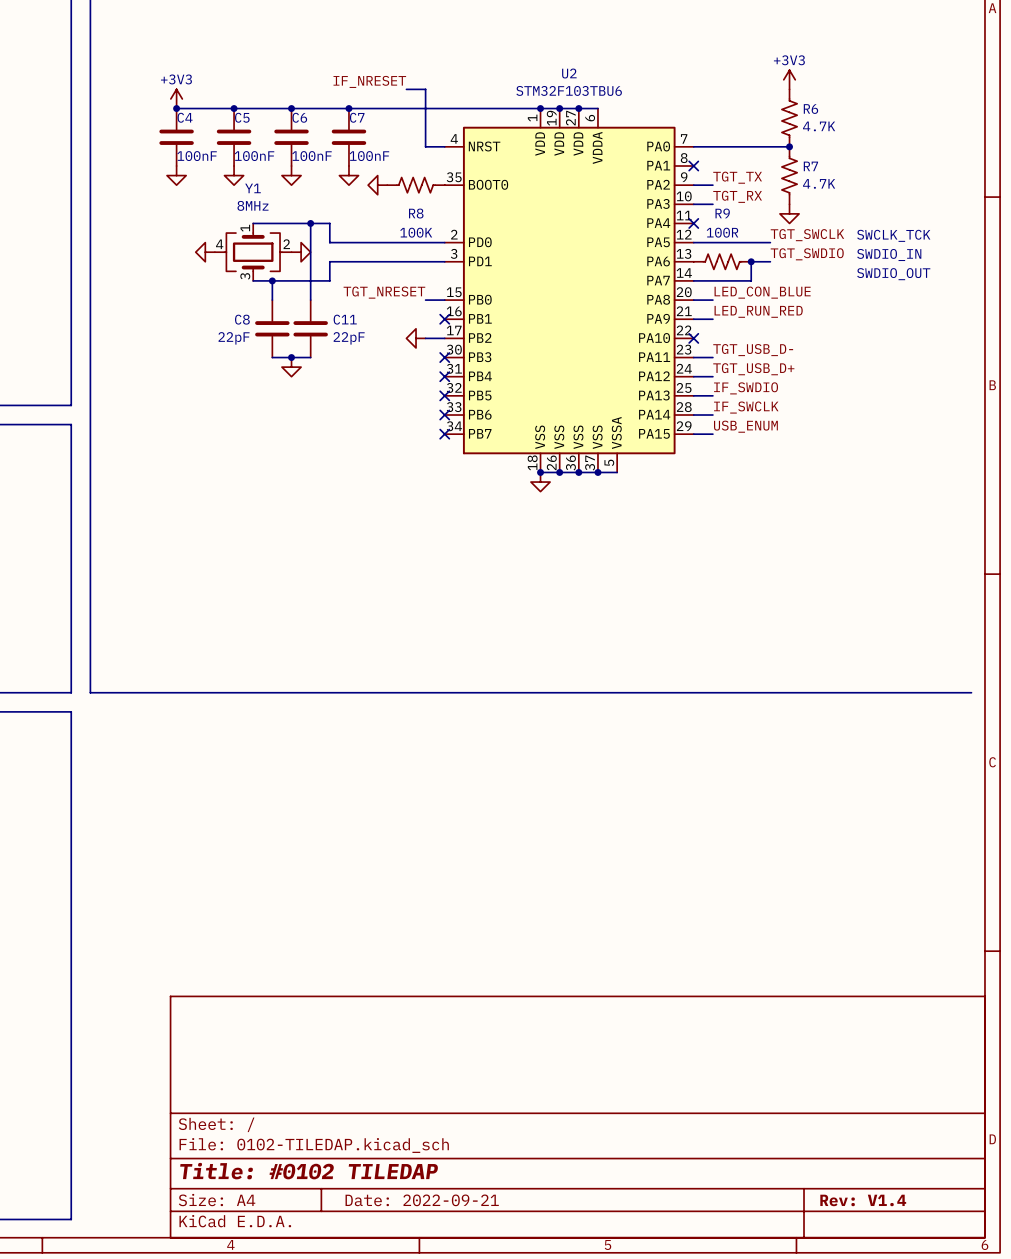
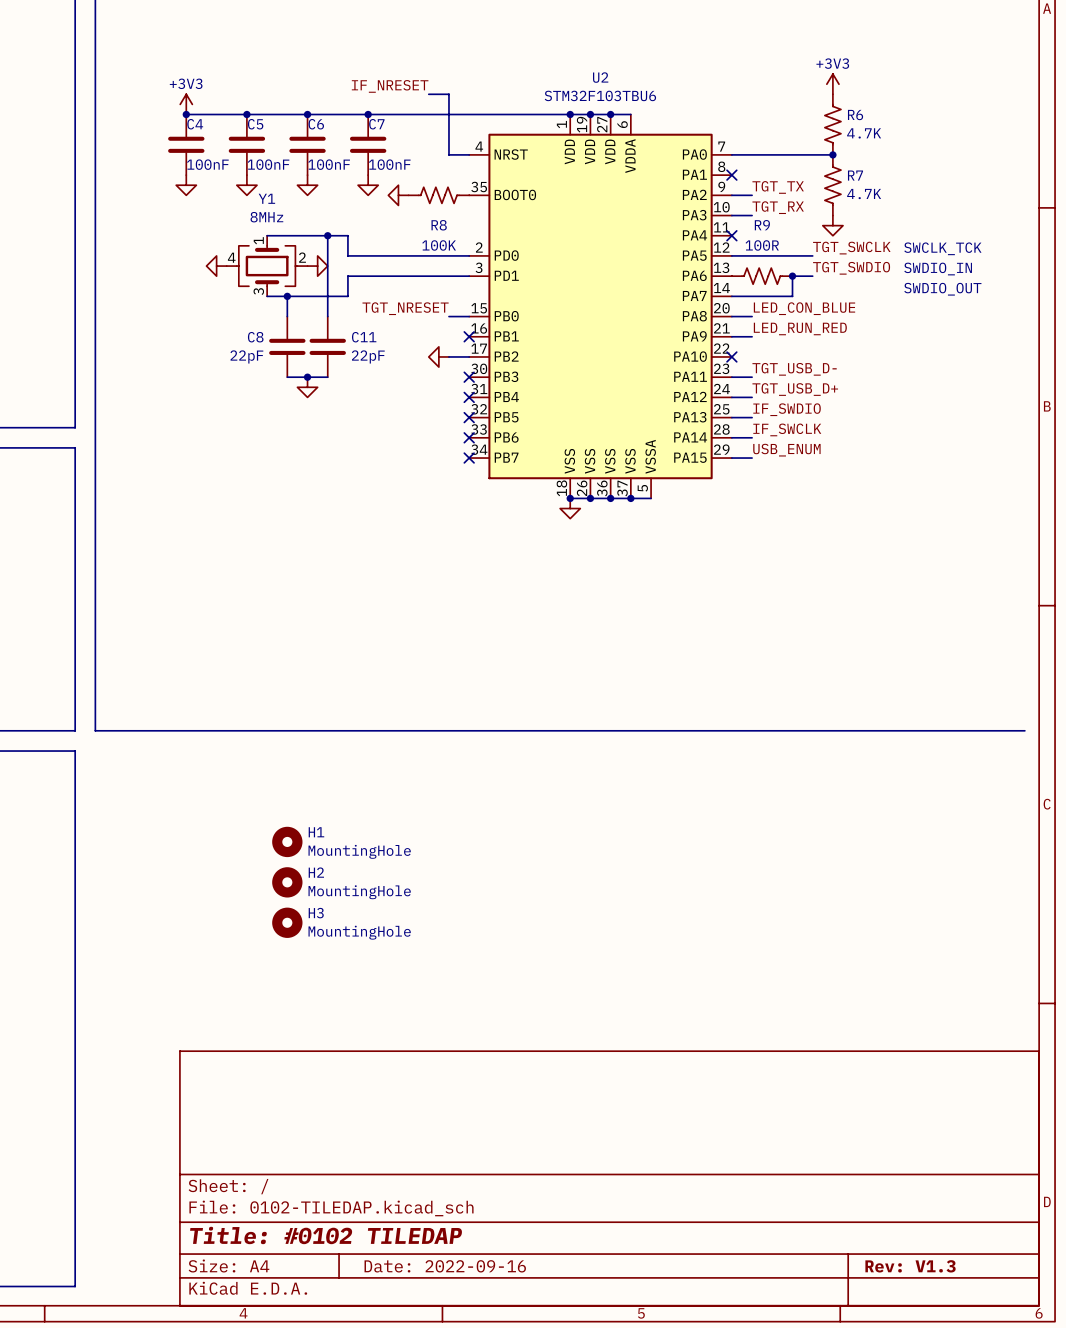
H1: none -> MountingHole (287, 841)
H2: none -> MountingHole (287, 882)
H3: none -> MountingHole (287, 922)
title block: Date: 2022-09-21 (422, 1200) -> Date: 2022-09-16 (445, 1266)
title block: Rev: V1.4 (863, 1200) -> Rev: V1.3 (910, 1266)

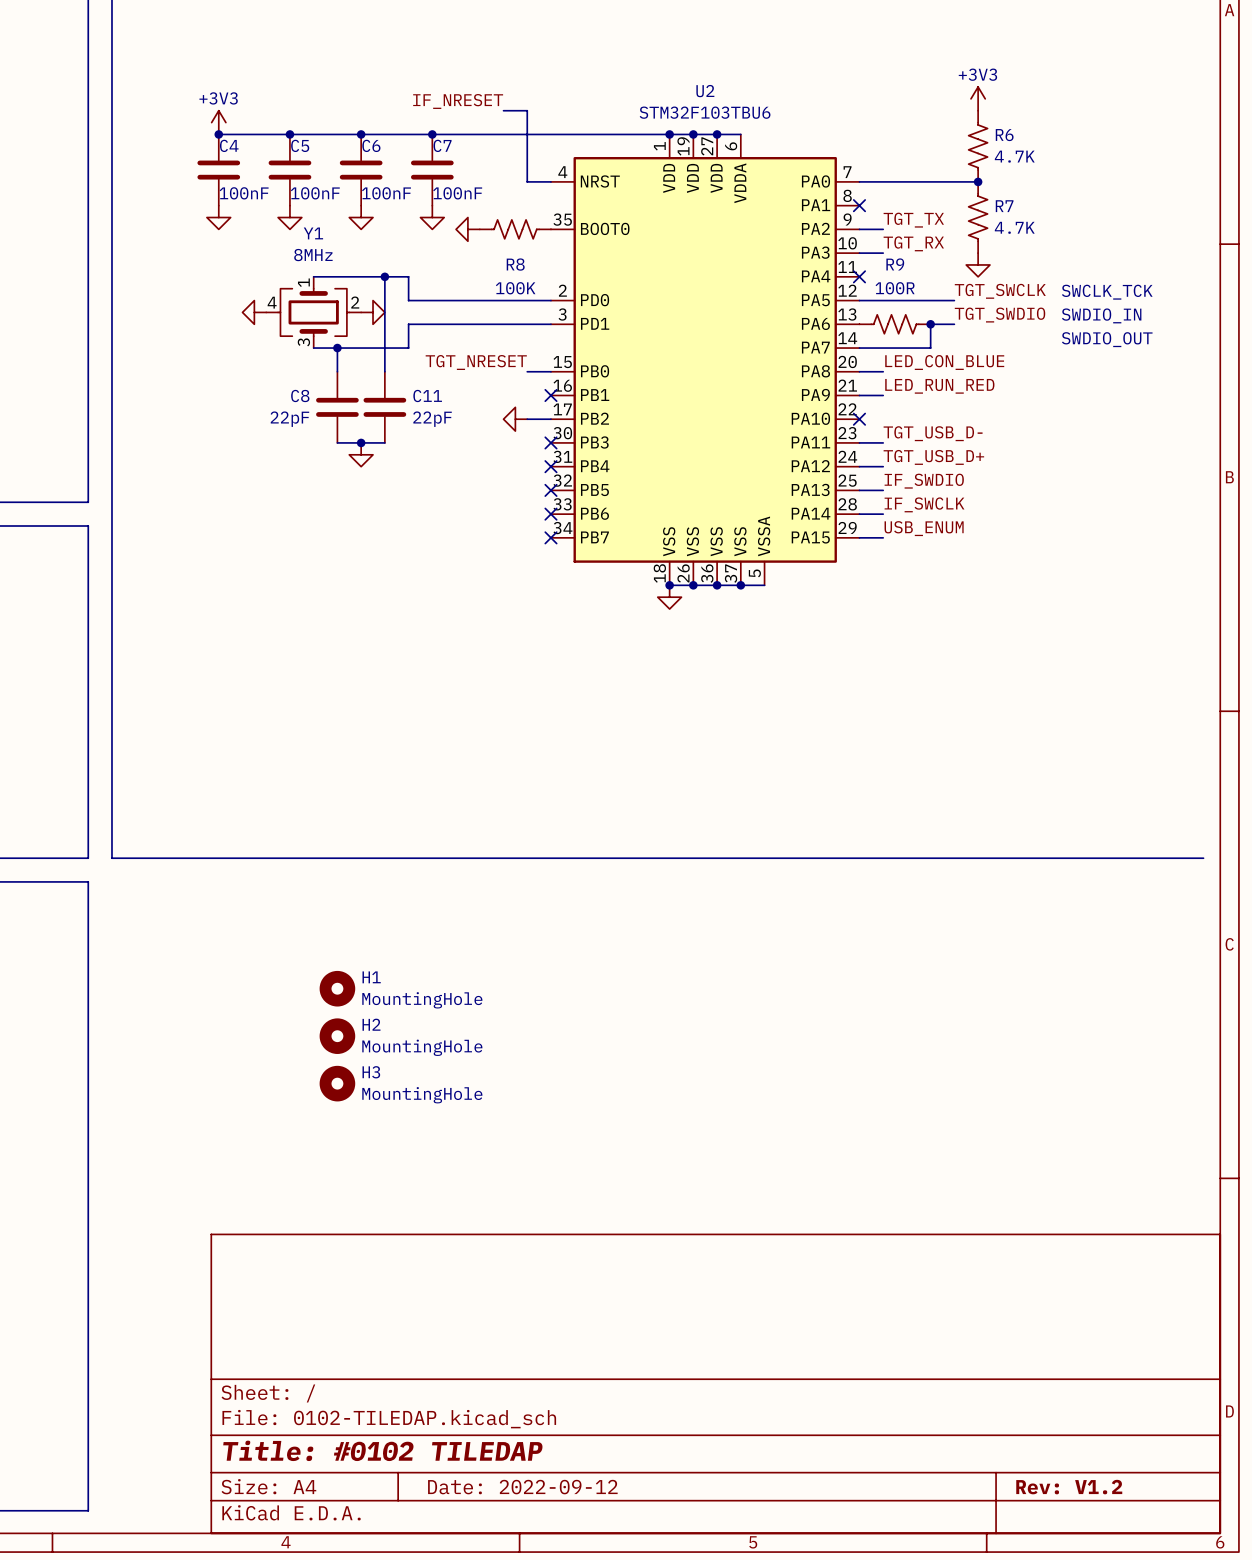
title block: Date: 2022-09-16 (445, 1266) -> Date: 2022-09-12 (522, 1487)
title block: Rev: V1.3 (910, 1266) -> Rev: V1.2 (1069, 1487)

